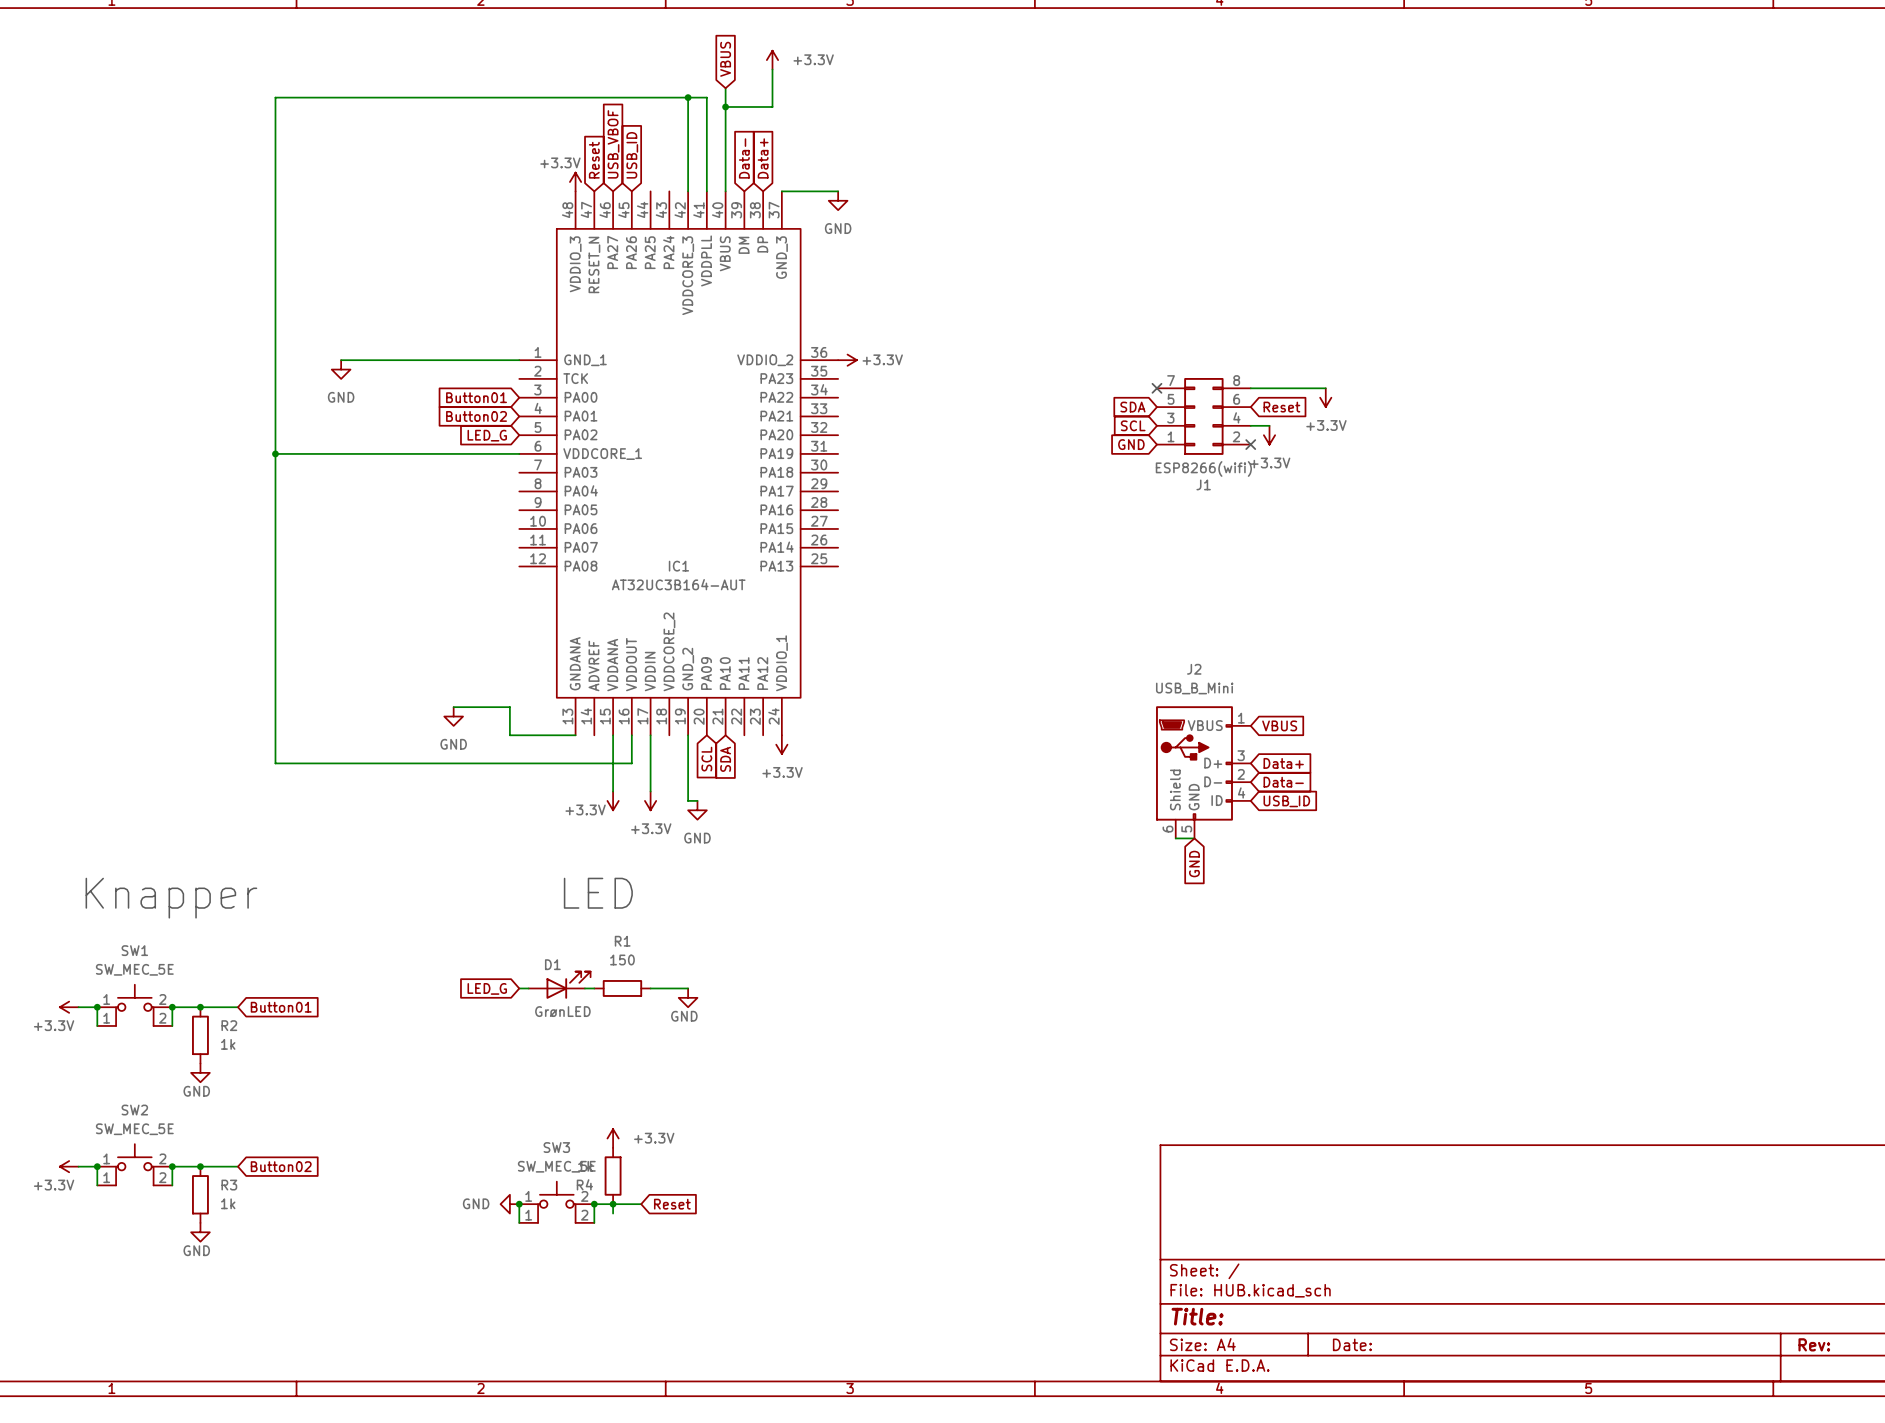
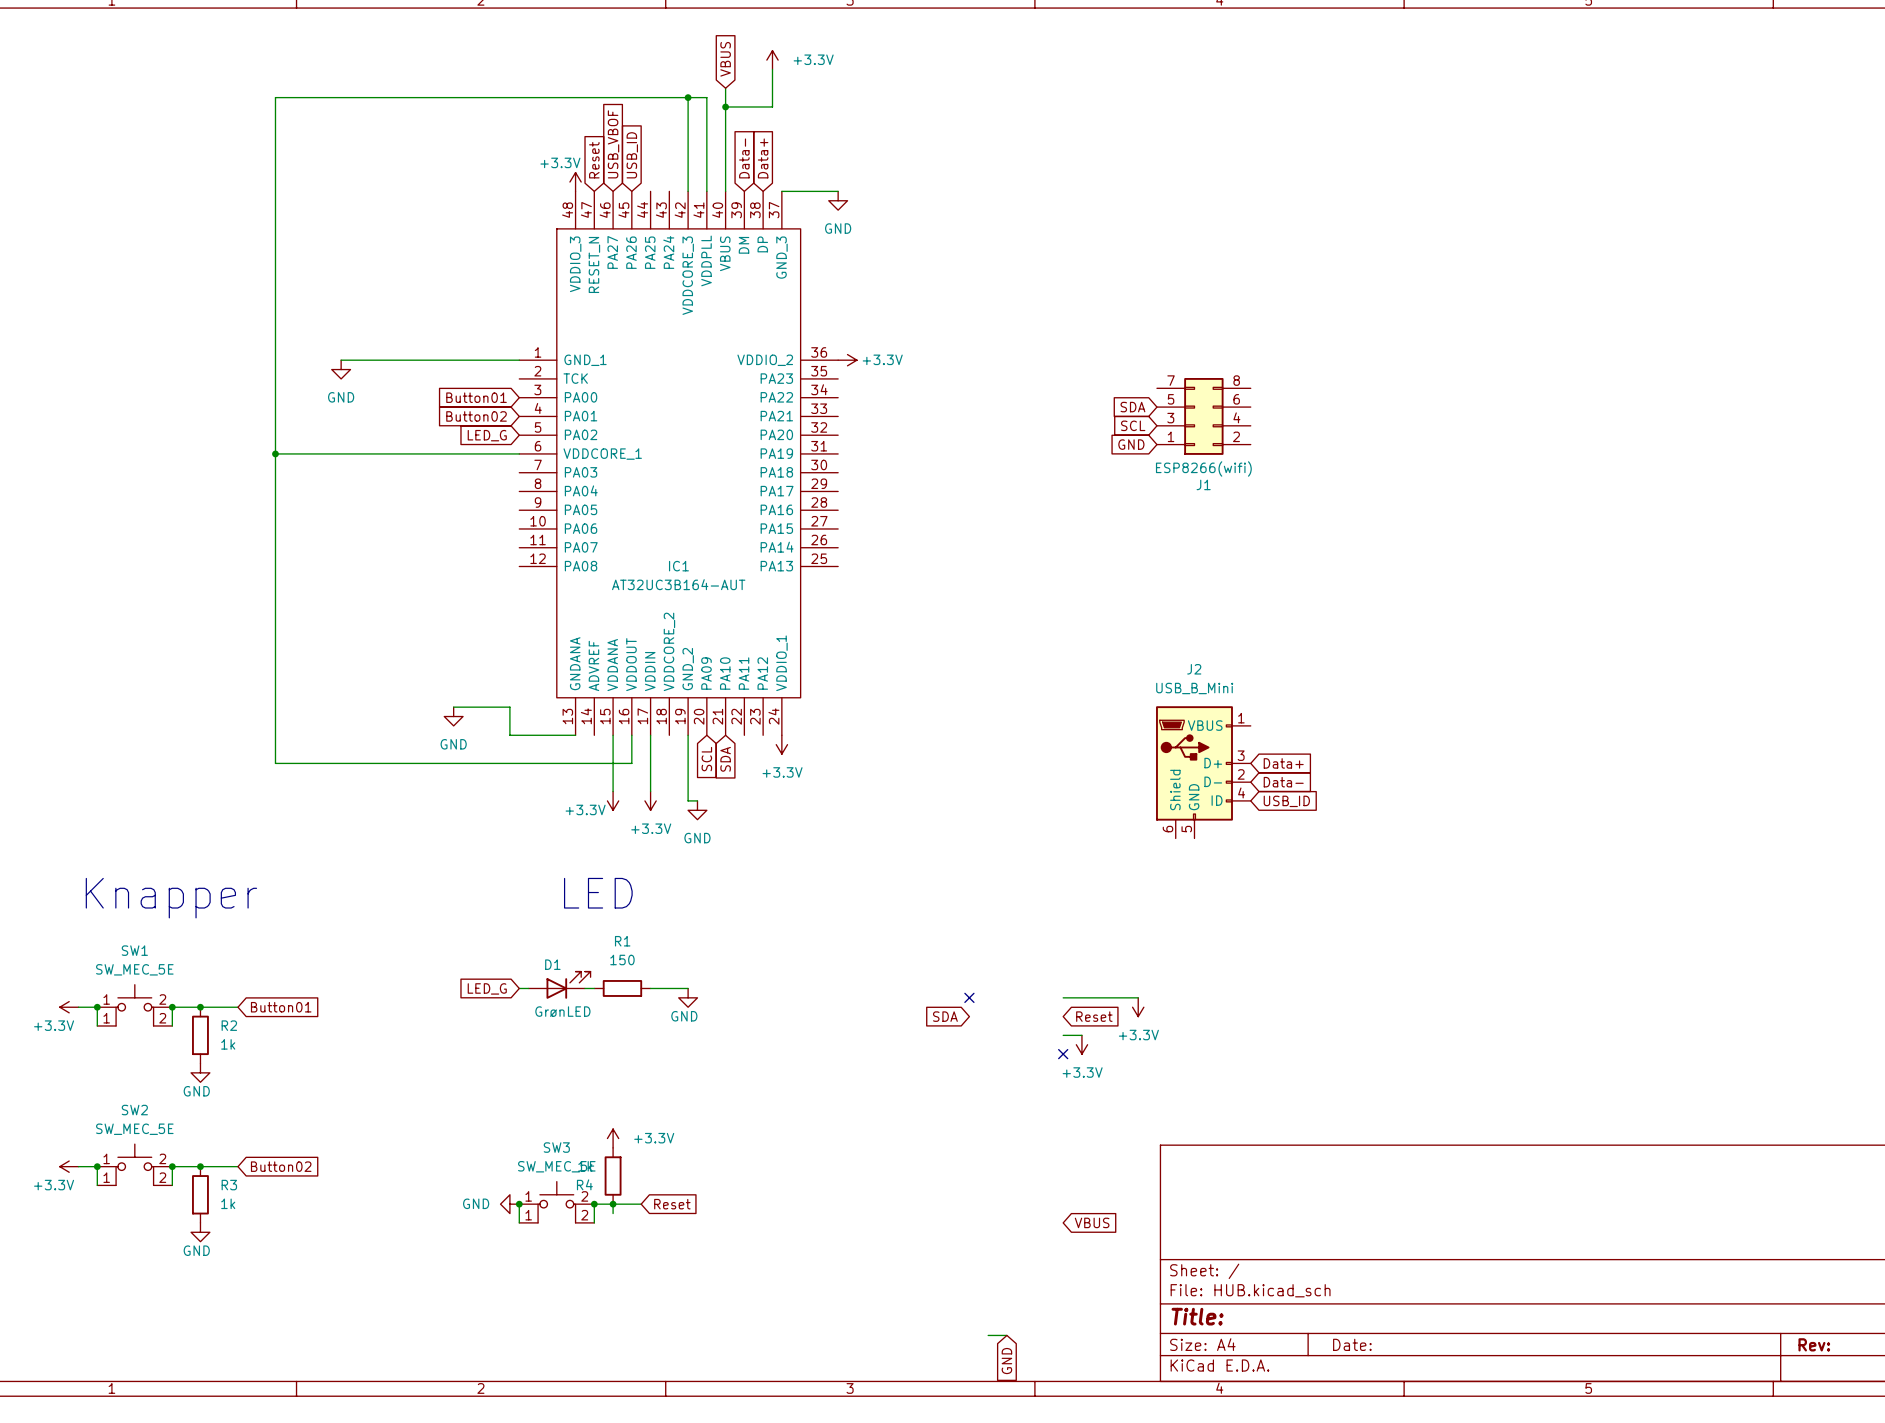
no-connect mark: (1156, 388) -> none
wire: (1250, 388) (1325, 388) -> none
power symbol: +3.3V (1325, 397) -> none
global label: Reset (1281, 407) -> none
wire: (1250, 425) (1269, 425) -> none
power symbol: +3.3V (1269, 435) -> none
no-connect mark: (1250, 444) -> none
global label: VBUS (1279, 725) -> none
wire: (1175, 838) (1194, 838) -> none
global label: GND (1194, 864) -> none
no-connect mark: none -> (969, 997)
wire: none -> (1063, 997) (1138, 997)
power symbol: none -> +3.3V (1138, 1007)
global label: none -> SDA (945, 1016)
global label: none -> Reset (1094, 1016)
wire: none -> (1063, 1035) (1081, 1035)
power symbol: none -> +3.3V (1081, 1044)
no-connect mark: none -> (1063, 1054)
global label: none -> VBUS (1092, 1222)
wire: none -> (988, 1335) (1006, 1335)
global label: none -> GND (1006, 1361)

